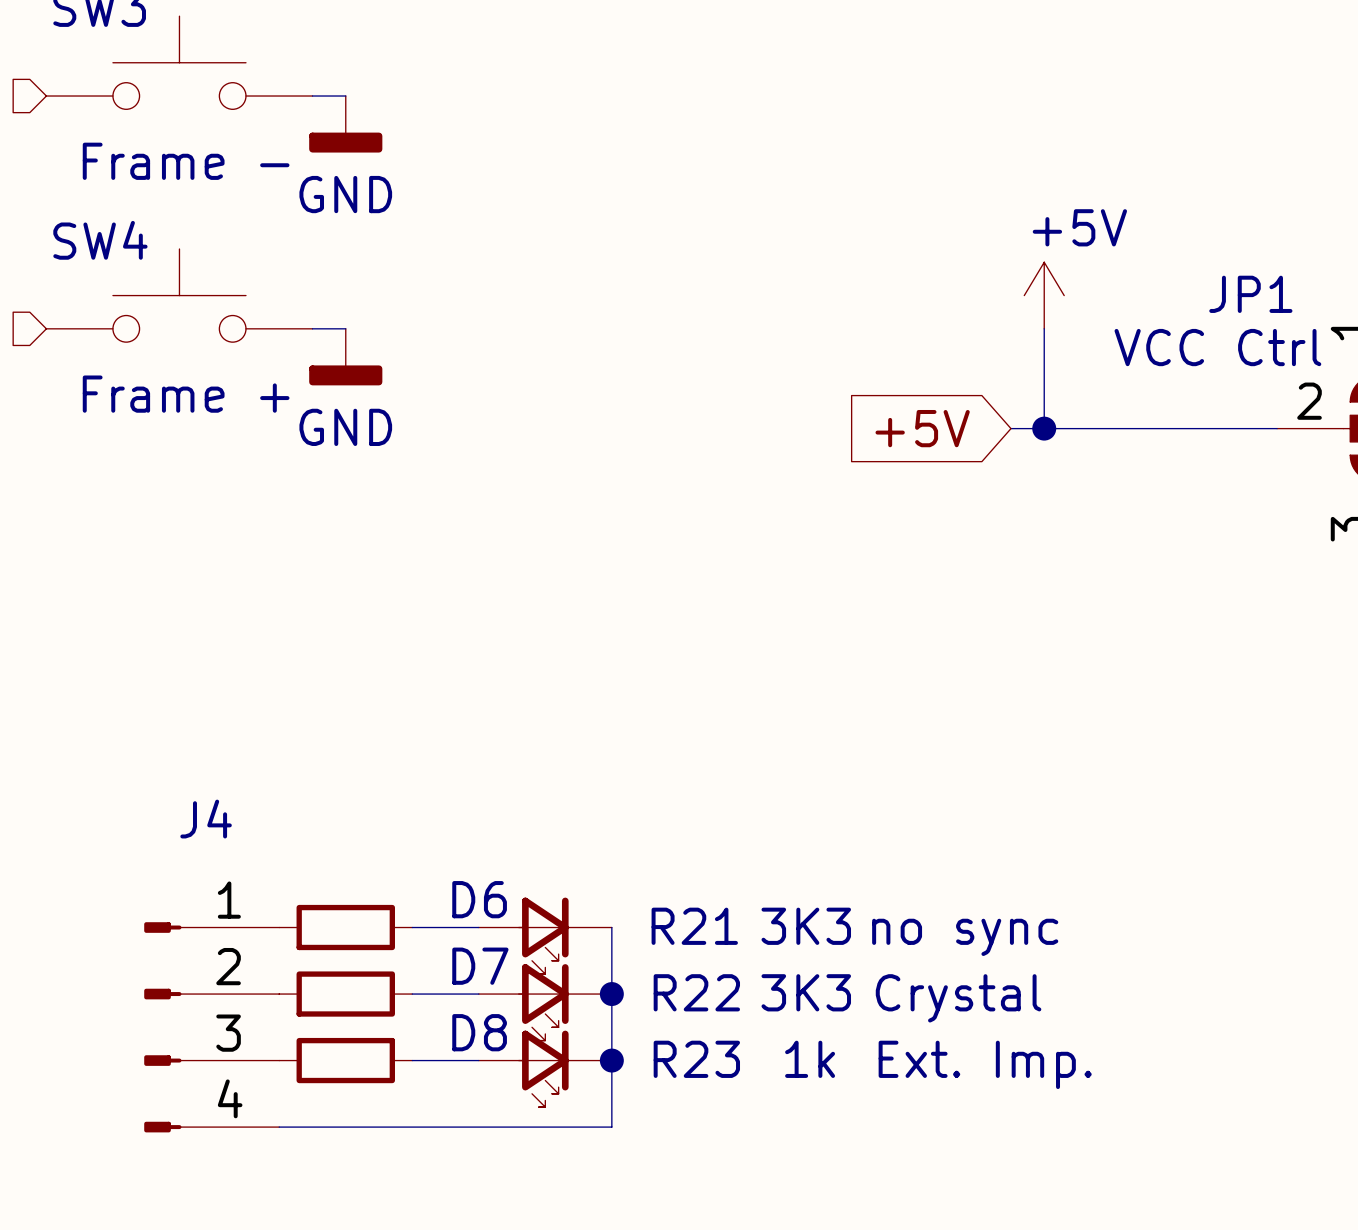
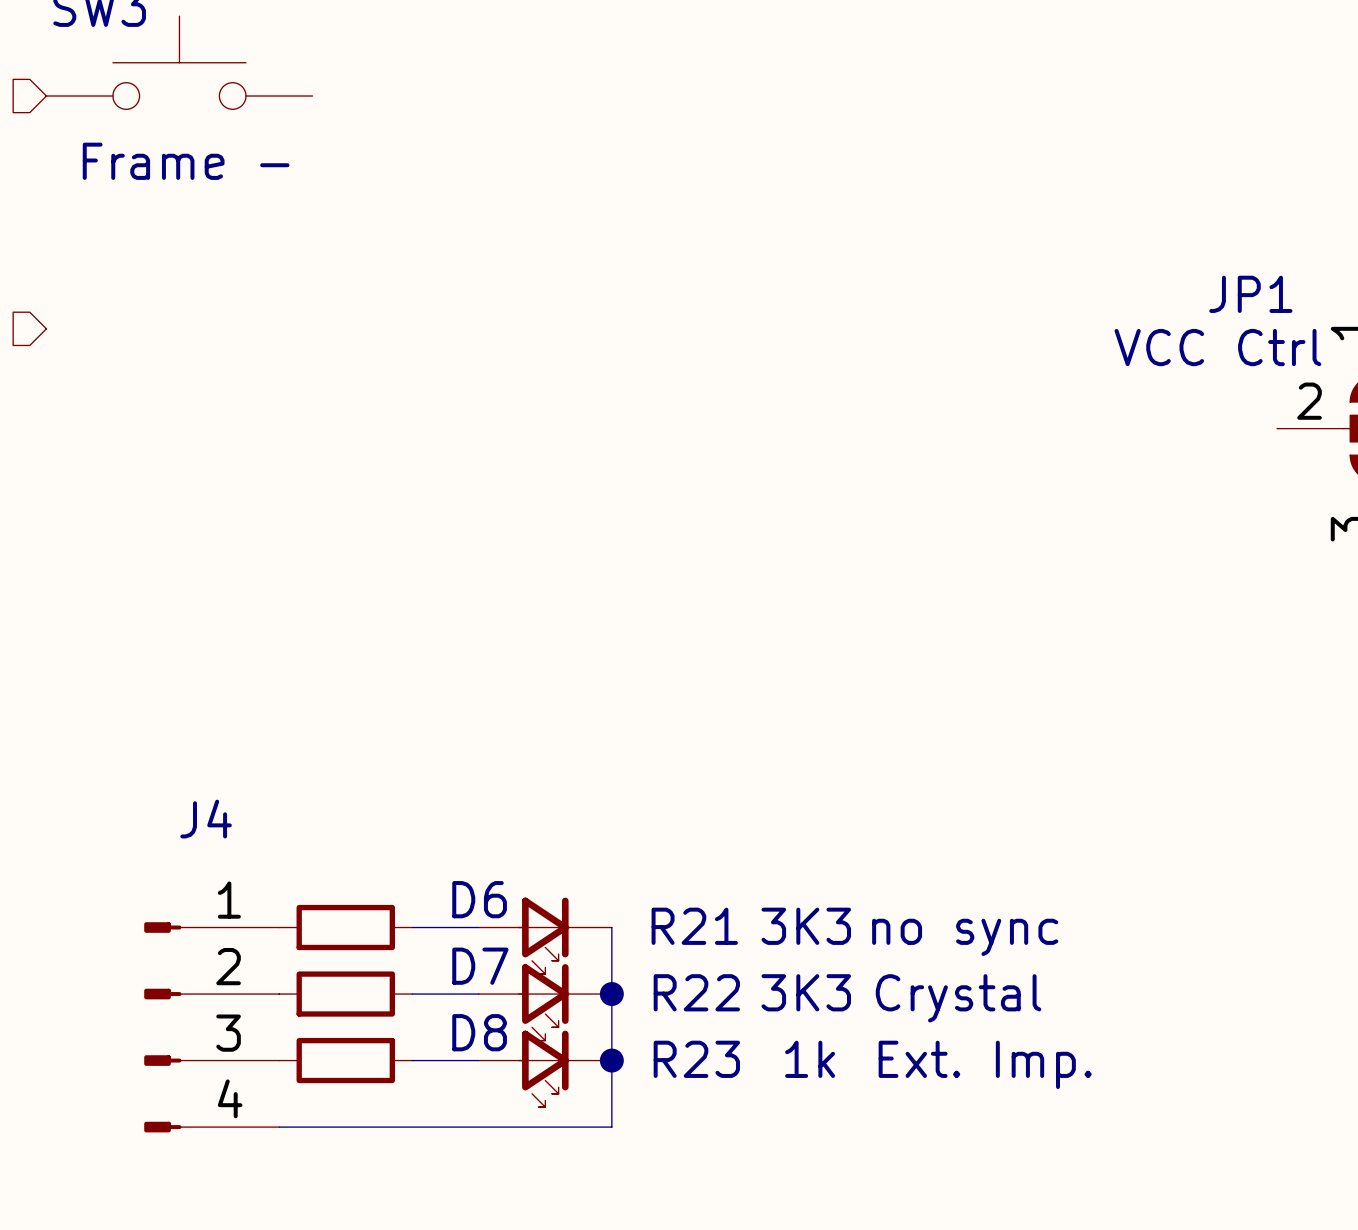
wire: (312, 96) (345, 96) -> none
power symbol: GND (345, 124) -> none
SW4: Frame + (179, 295) -> none
power symbol: +5V (1044, 295) -> none
wire: (312, 328) (345, 328) -> none
wire: (1044, 328) (1044, 428) -> none
power symbol: GND (345, 357) -> none
global label: +5V (922, 428) -> none
wire: (1010, 428) (1277, 428) -> none
junction: (1044, 428) -> none

